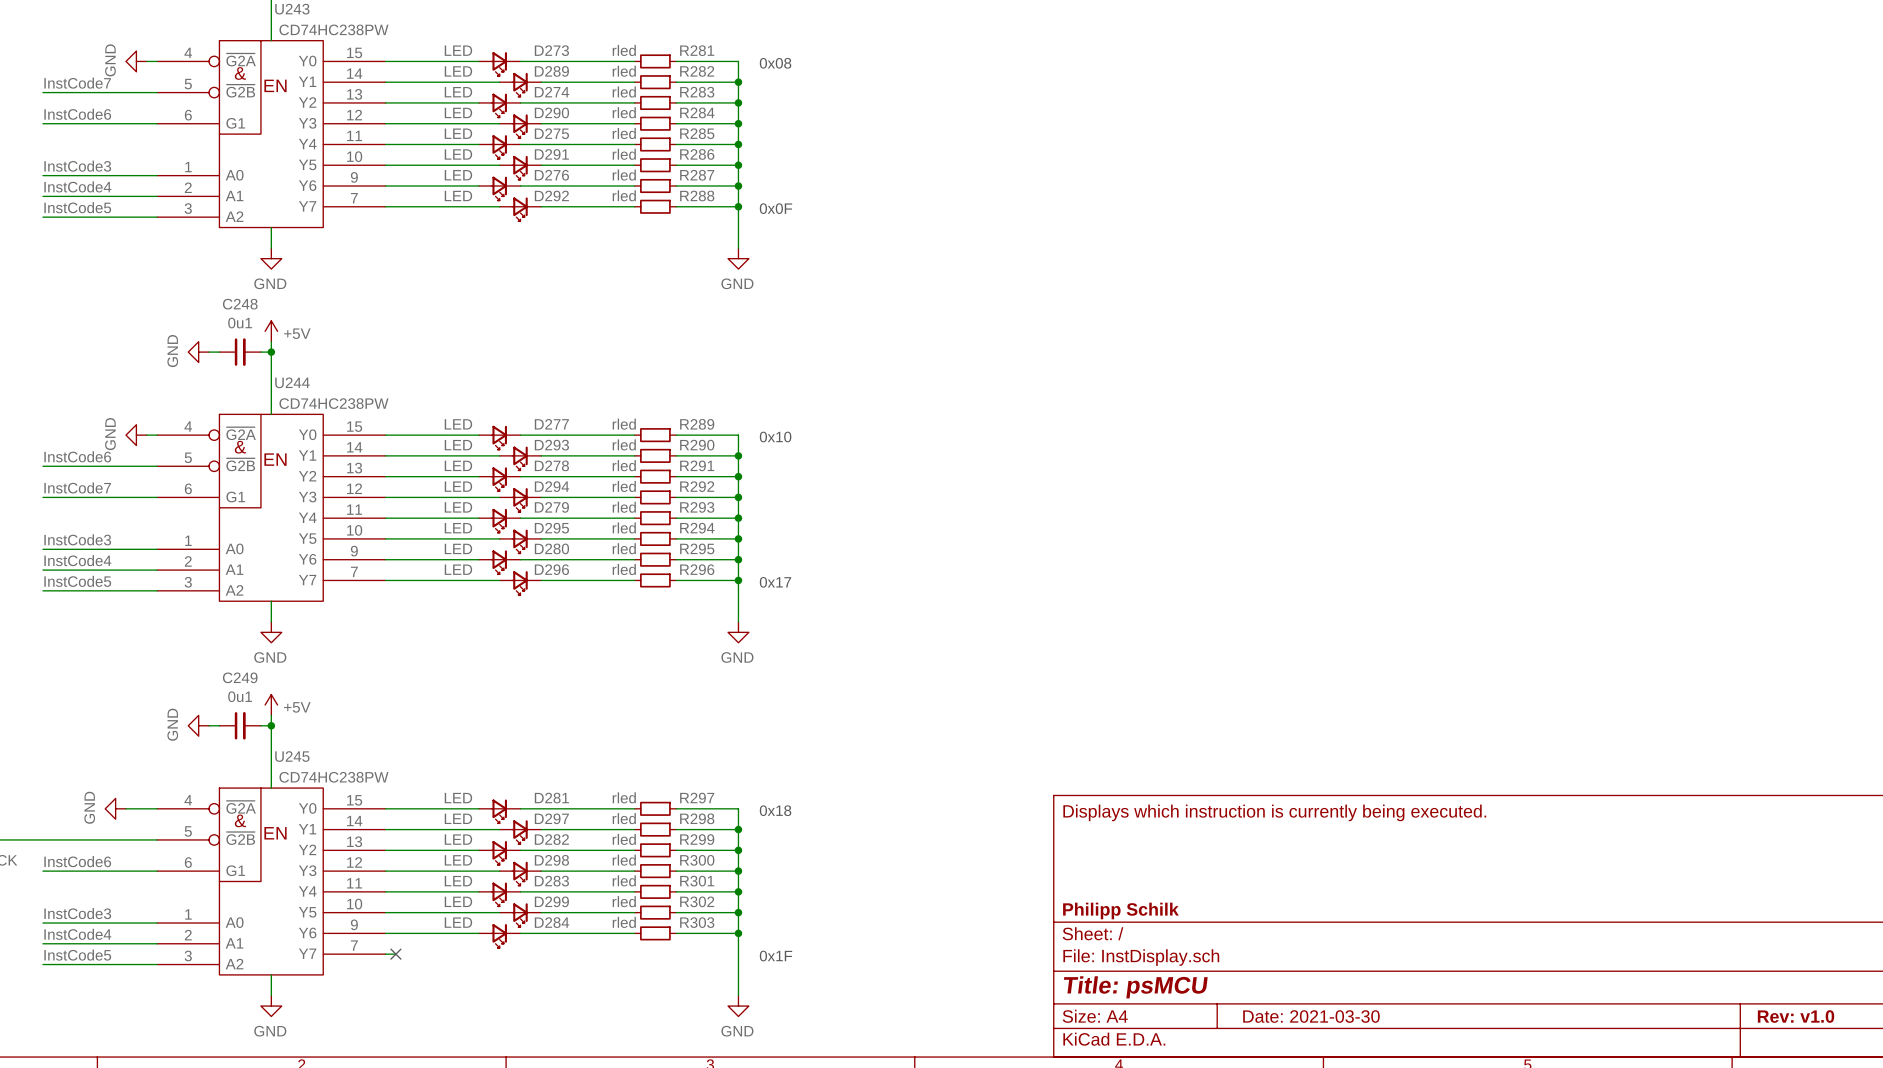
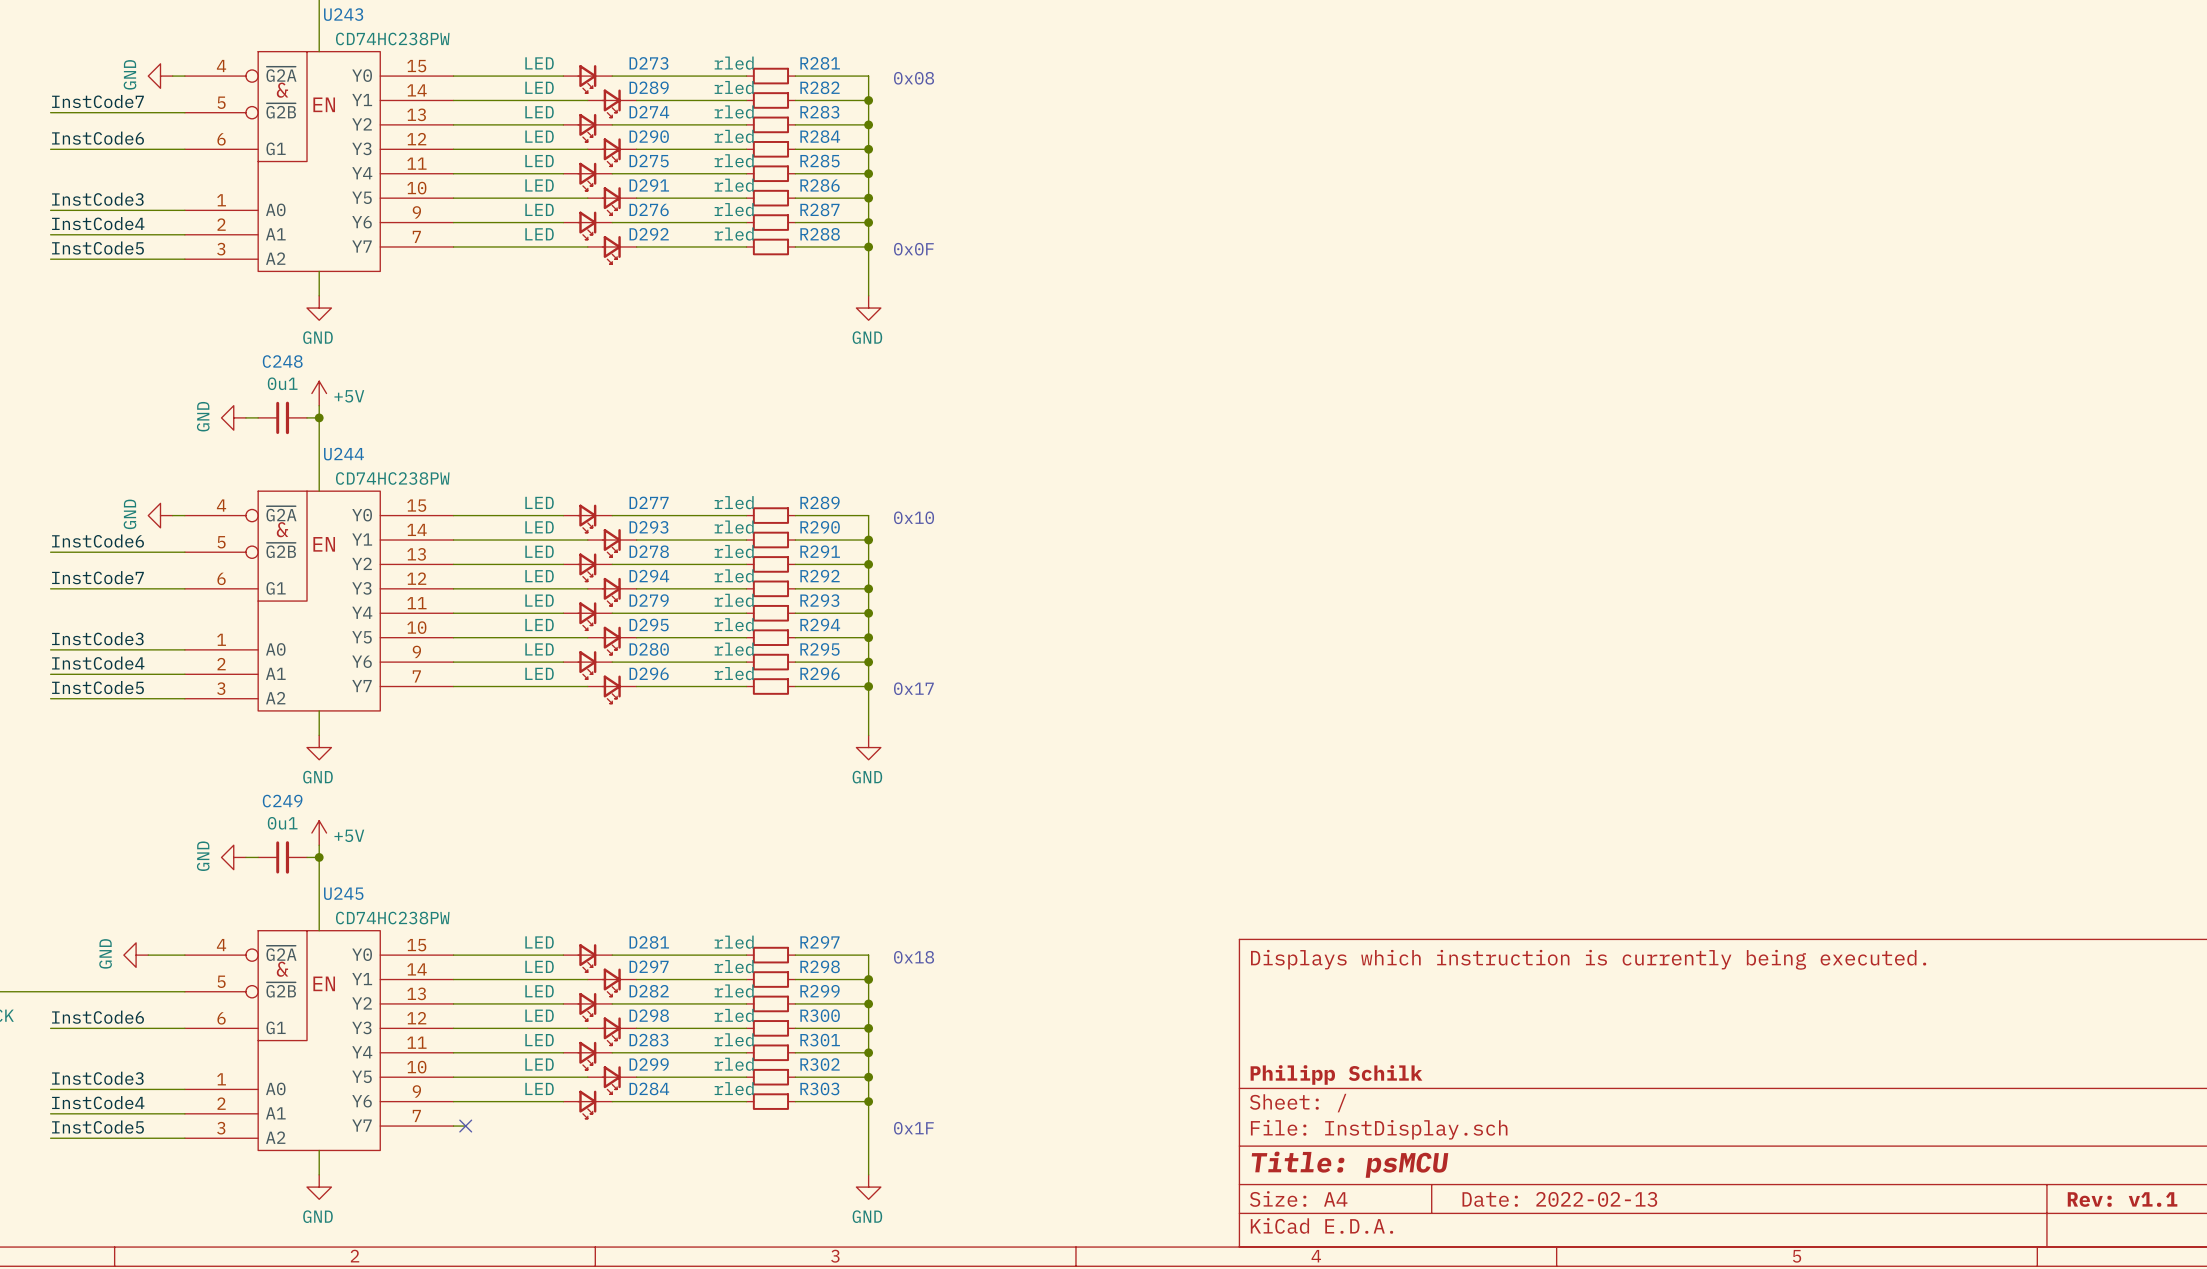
title block: Date: 2021-03-30 (1311, 1016) -> Date: 2022-02-13 (1559, 1199)
title block: Rev: v1.0 (1796, 1016) -> Rev: v1.1 (2122, 1199)

